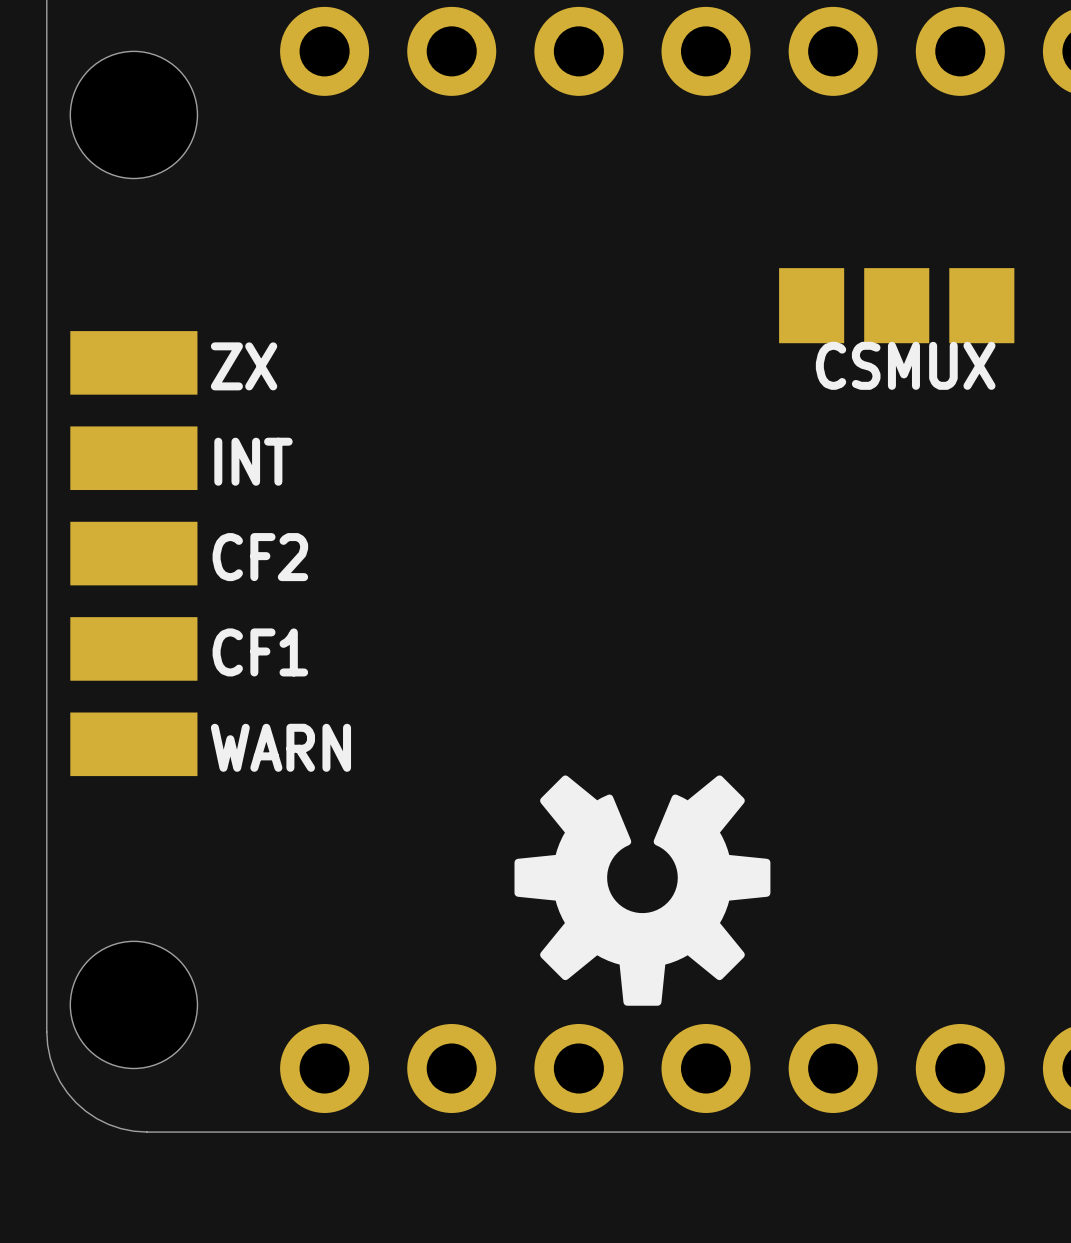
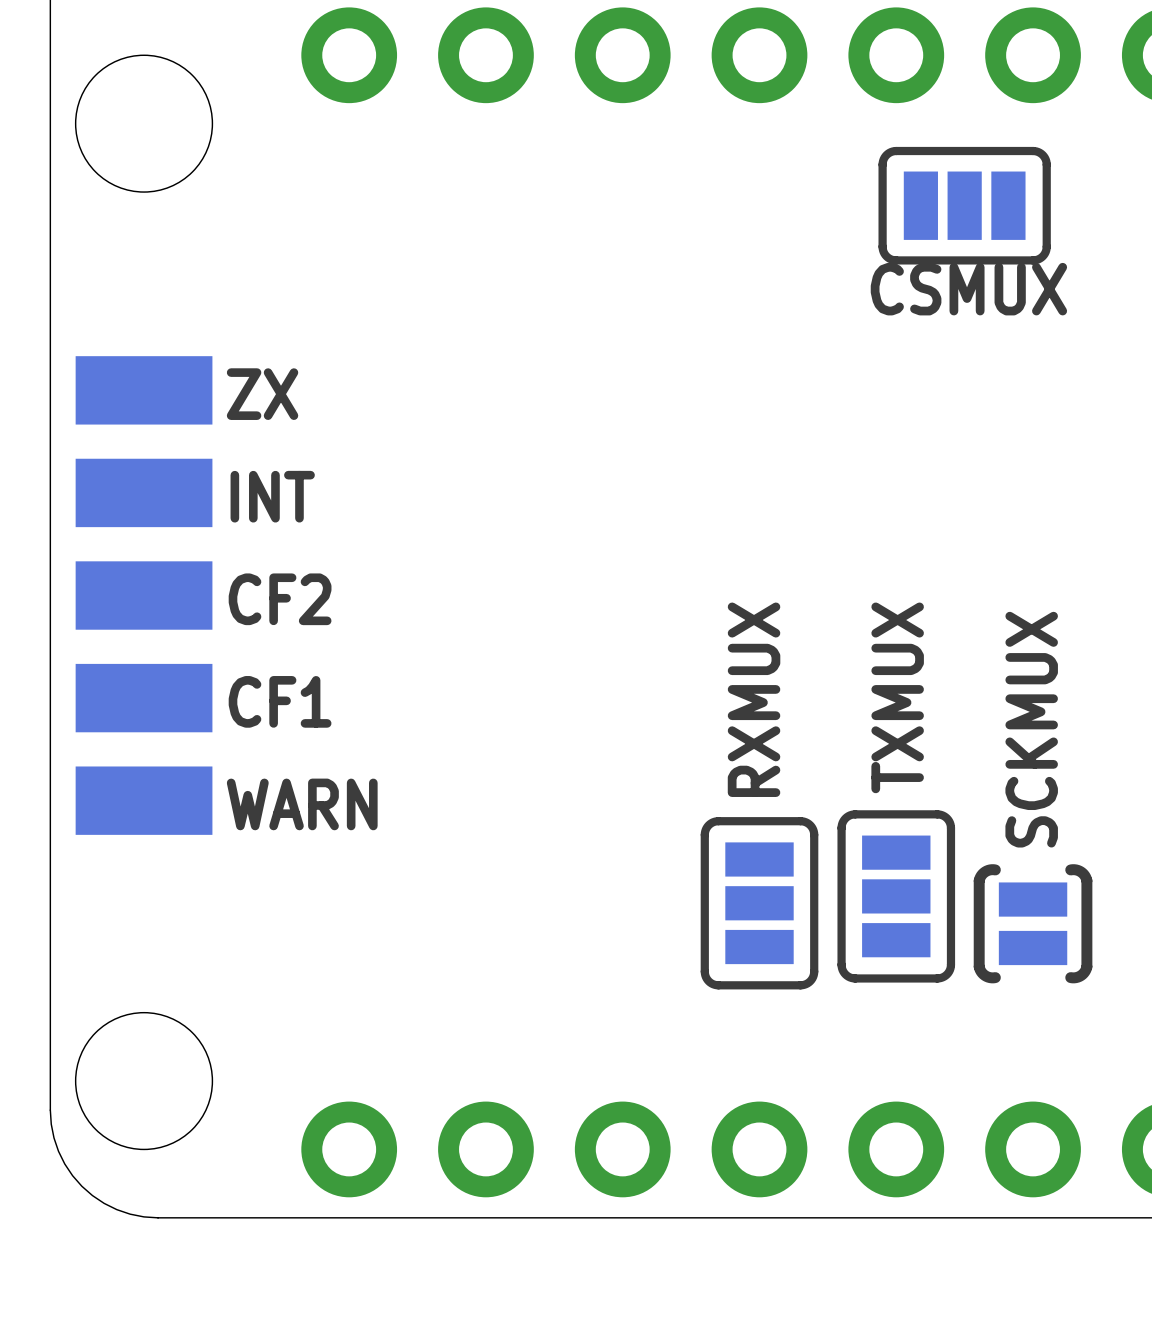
CSMUX: none -> (964, 205)
CSMUX: (896, 305) -> none
drawing: [514, 775, 771, 1006] -> none
RXMUX: none -> (896, 896)
TXMUX: none -> (759, 903)
SCKMUX: none -> (1033, 923)

